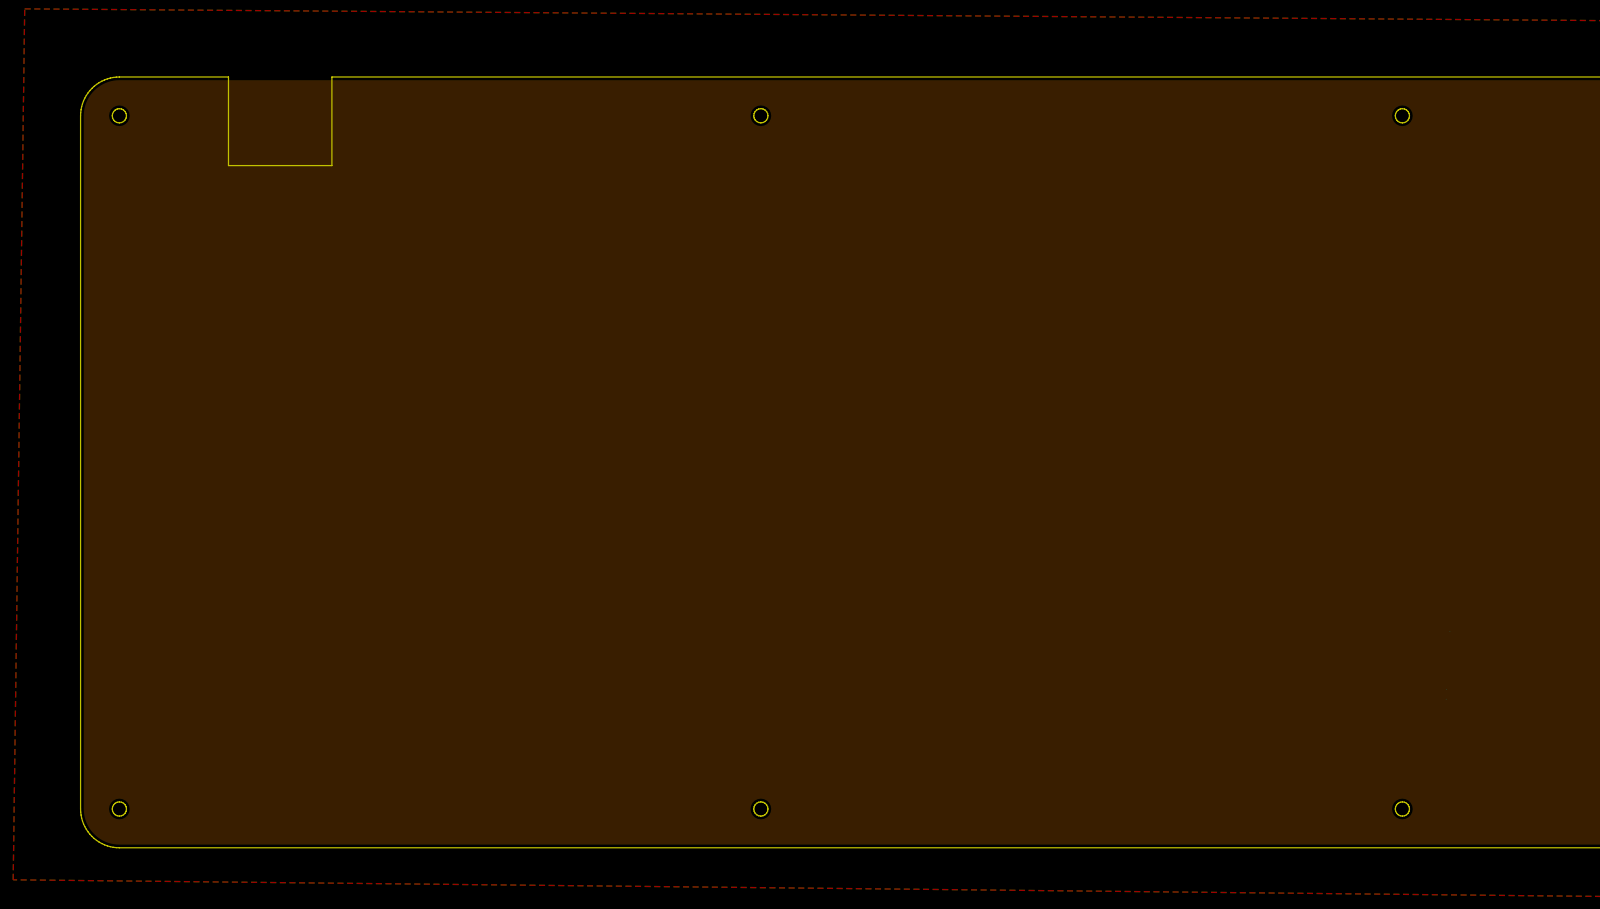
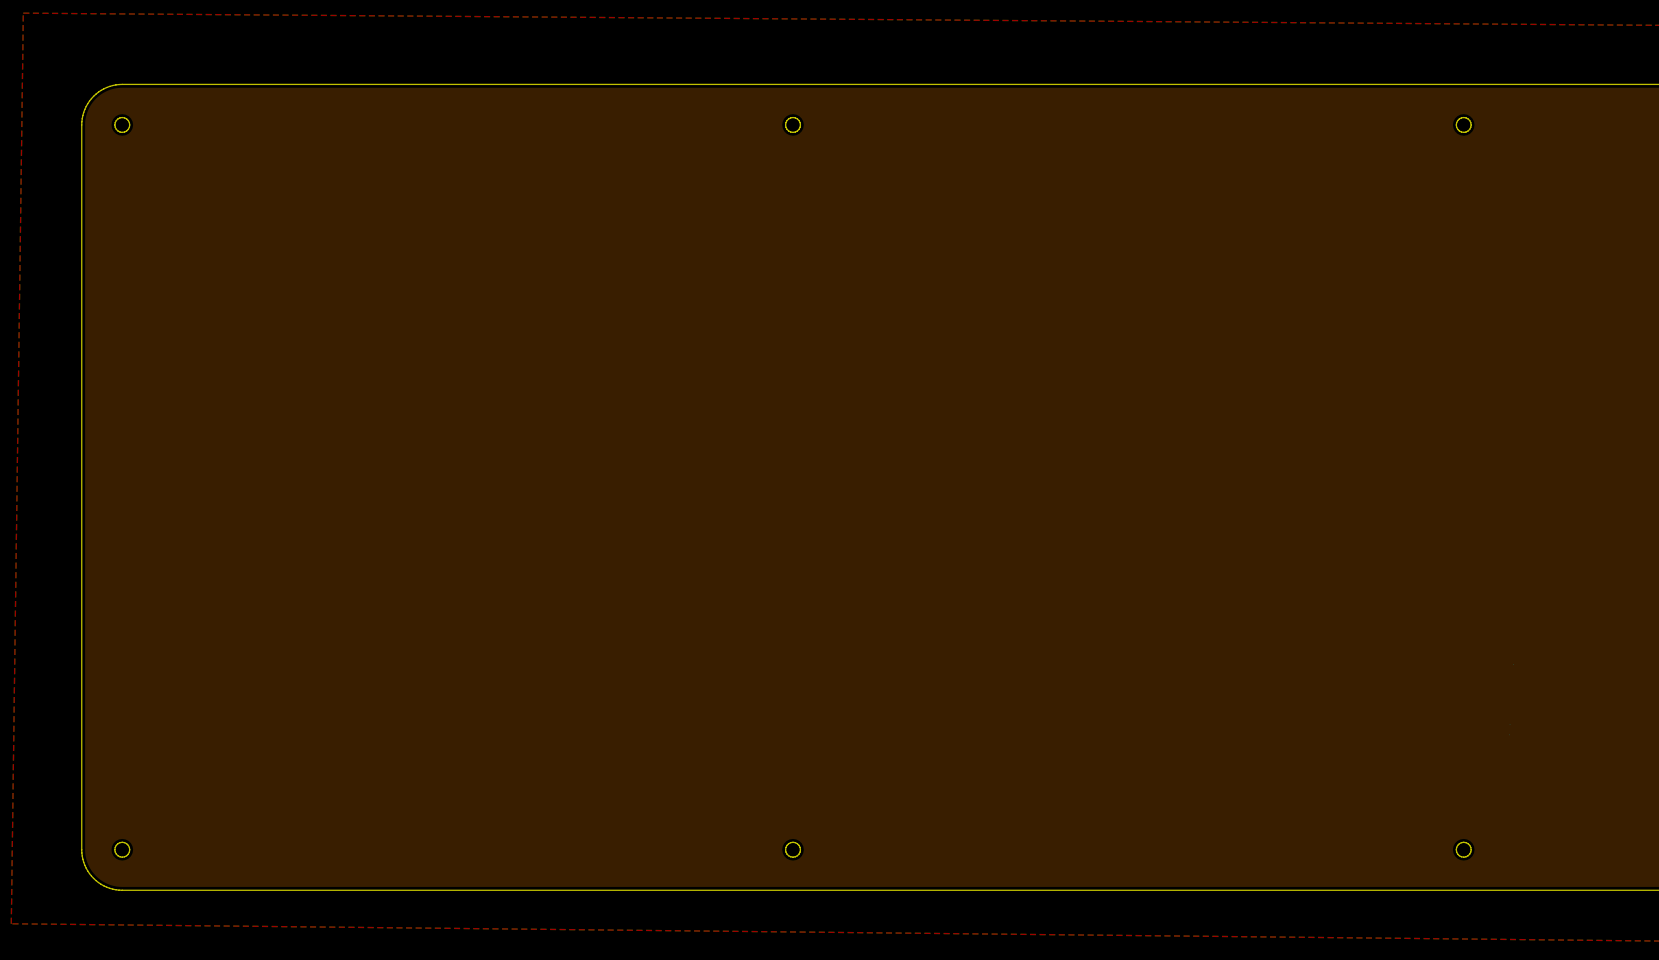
board edge: (228, 76) (228, 165) (331, 165) (331, 76) -> (236, 84) (344, 84)

